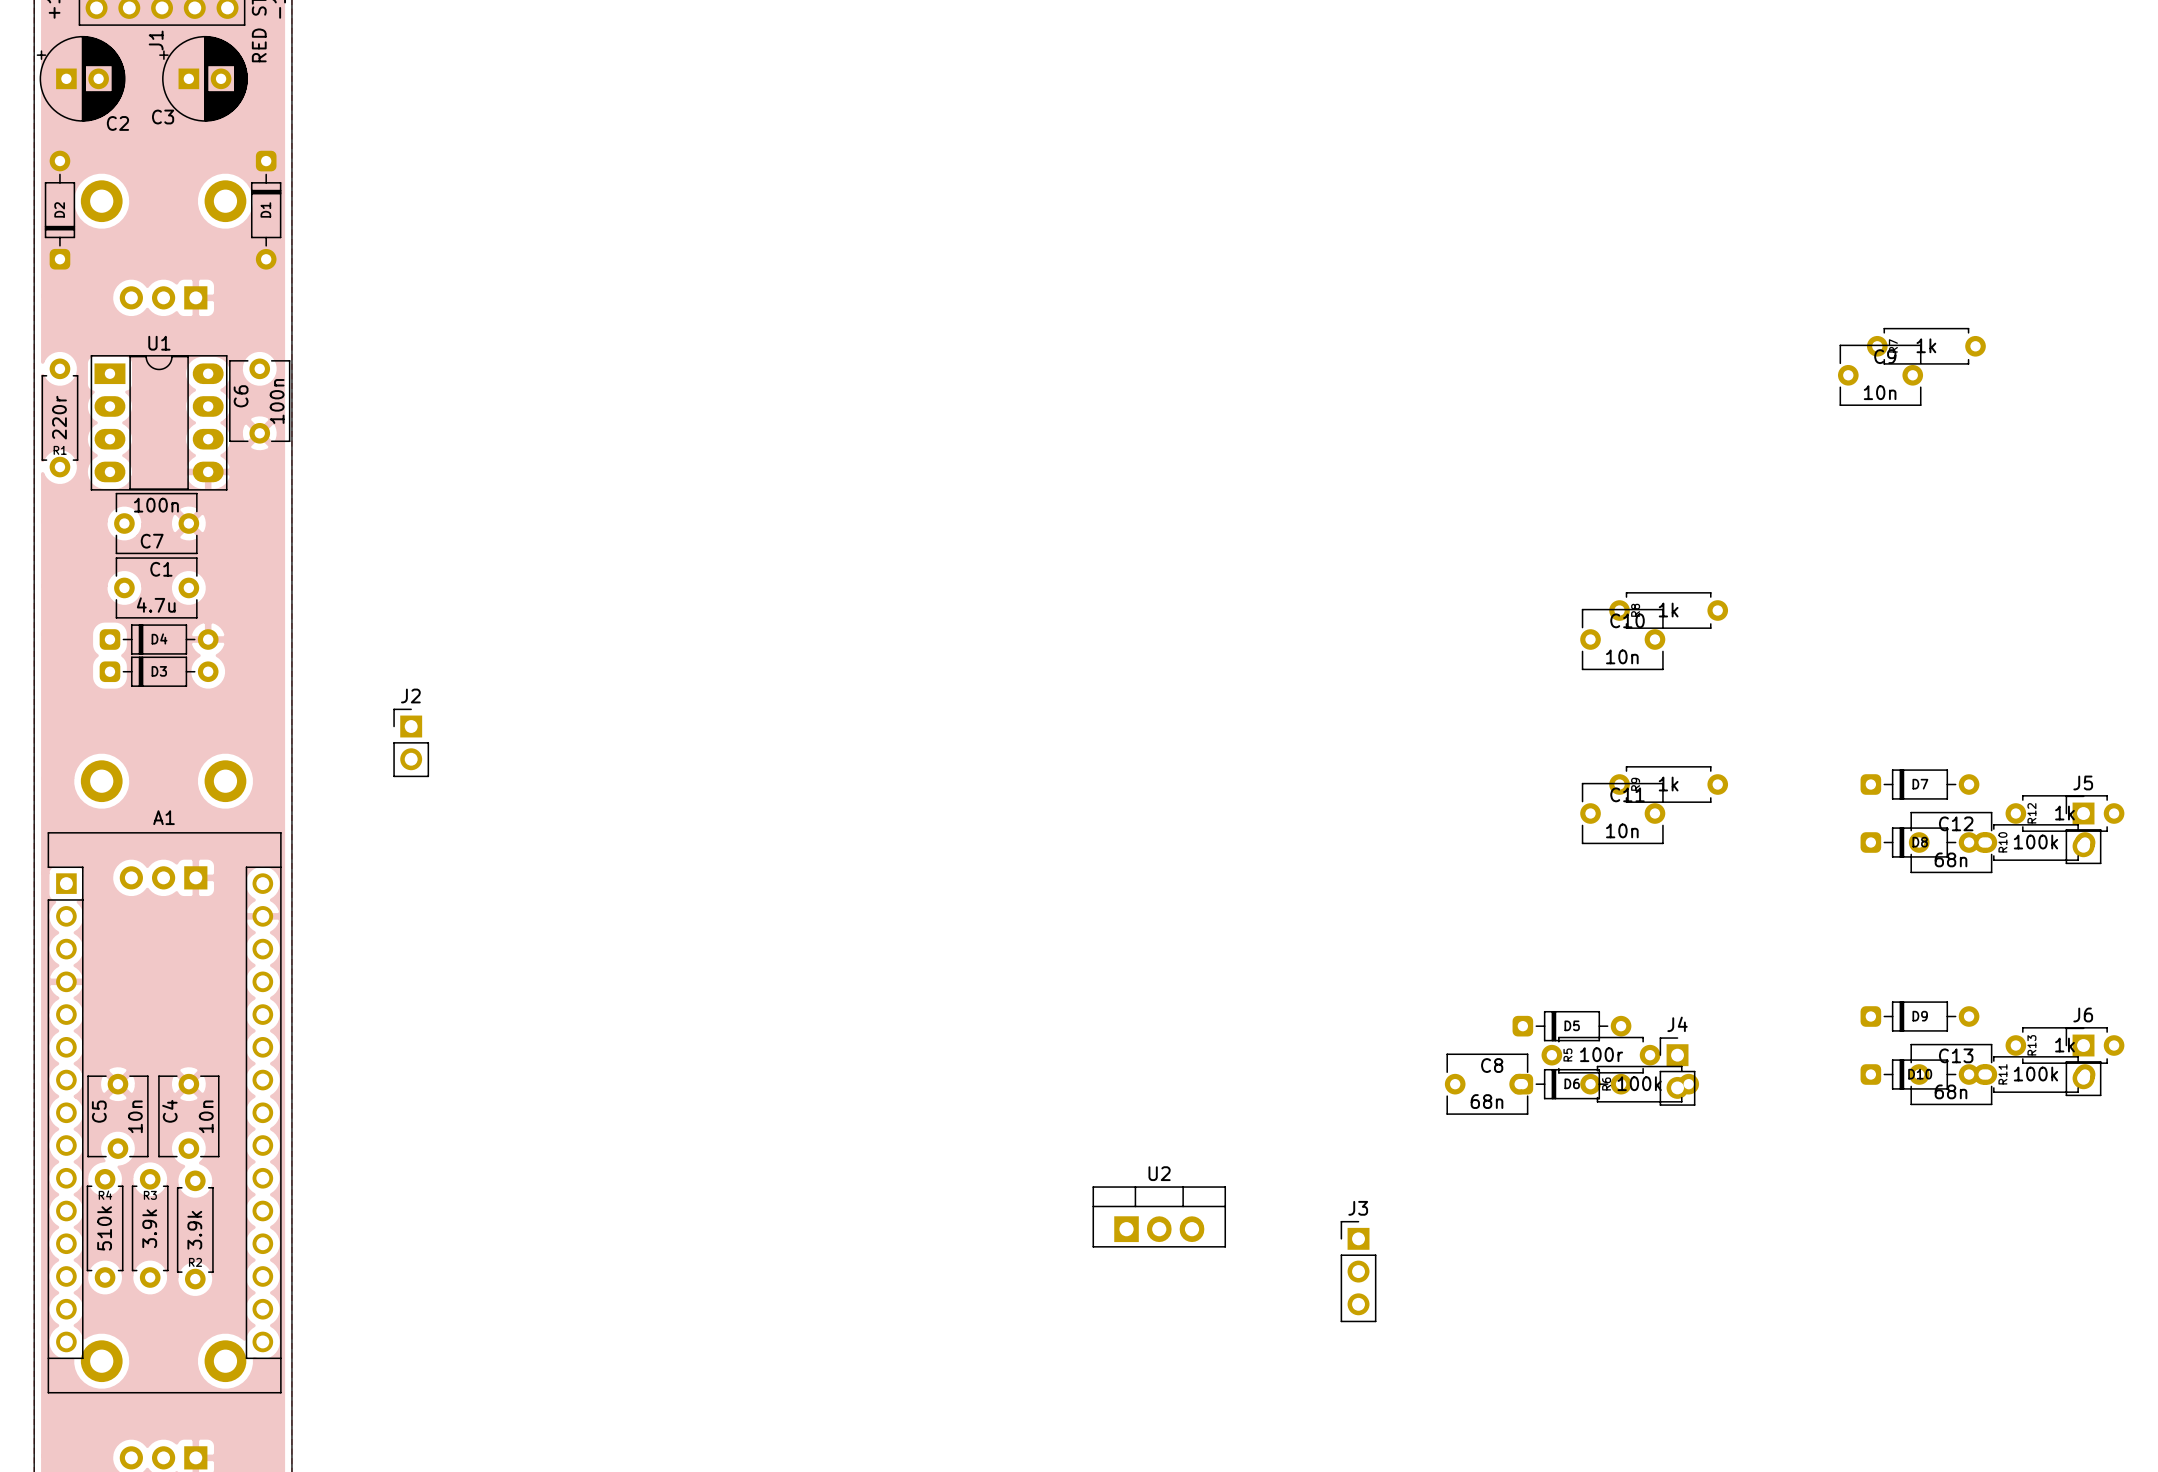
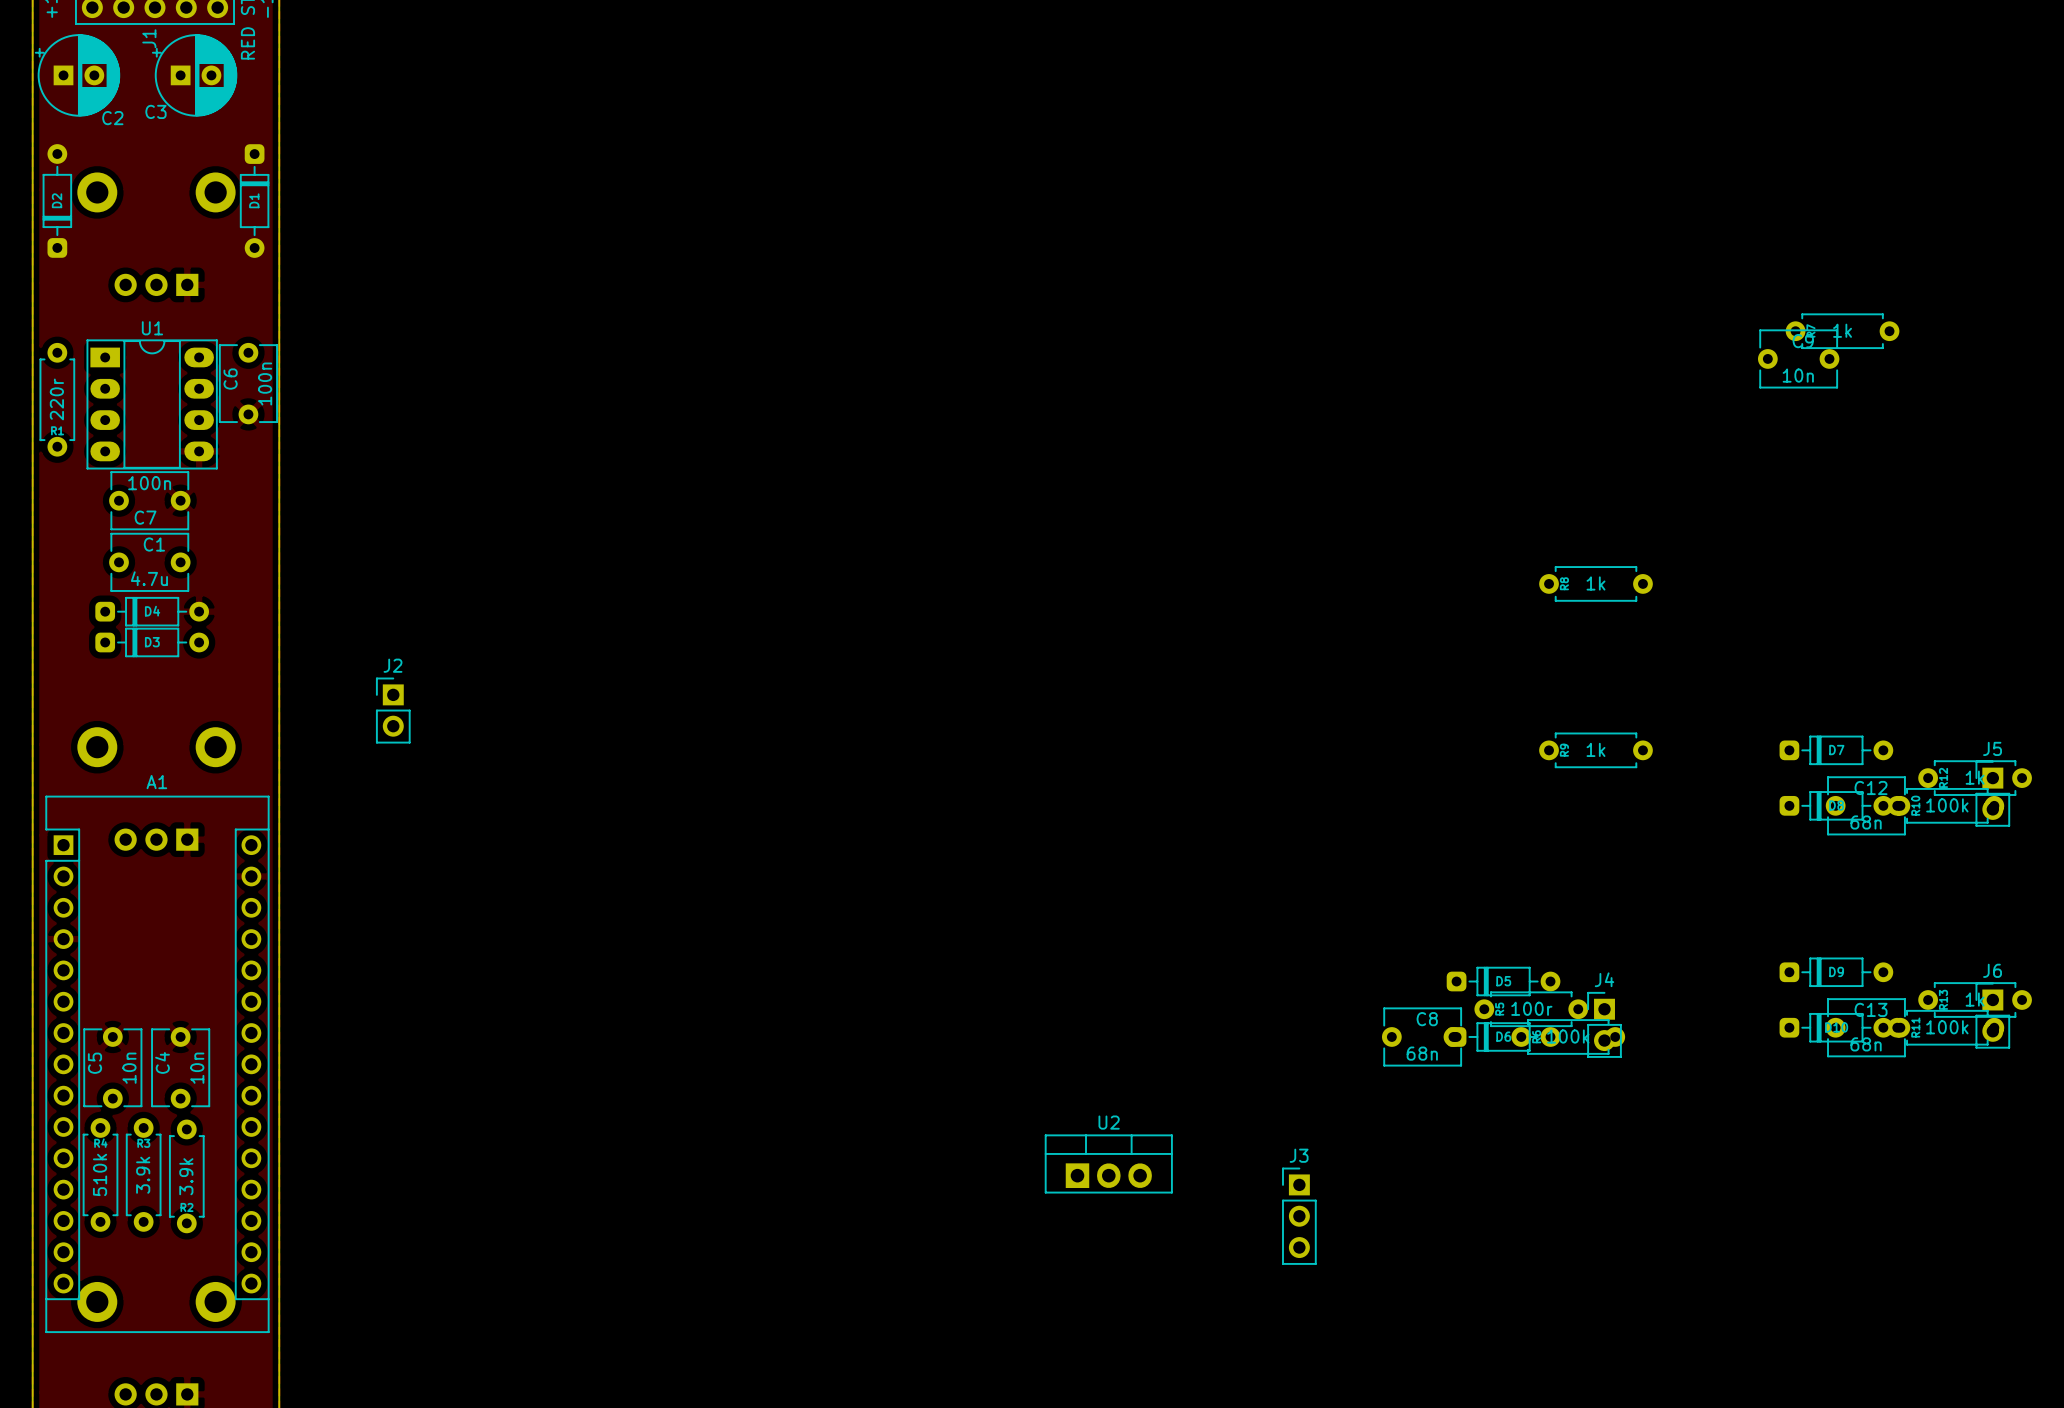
C10: 10n (1622, 639) -> none
C11: 10n (1622, 813) -> none

